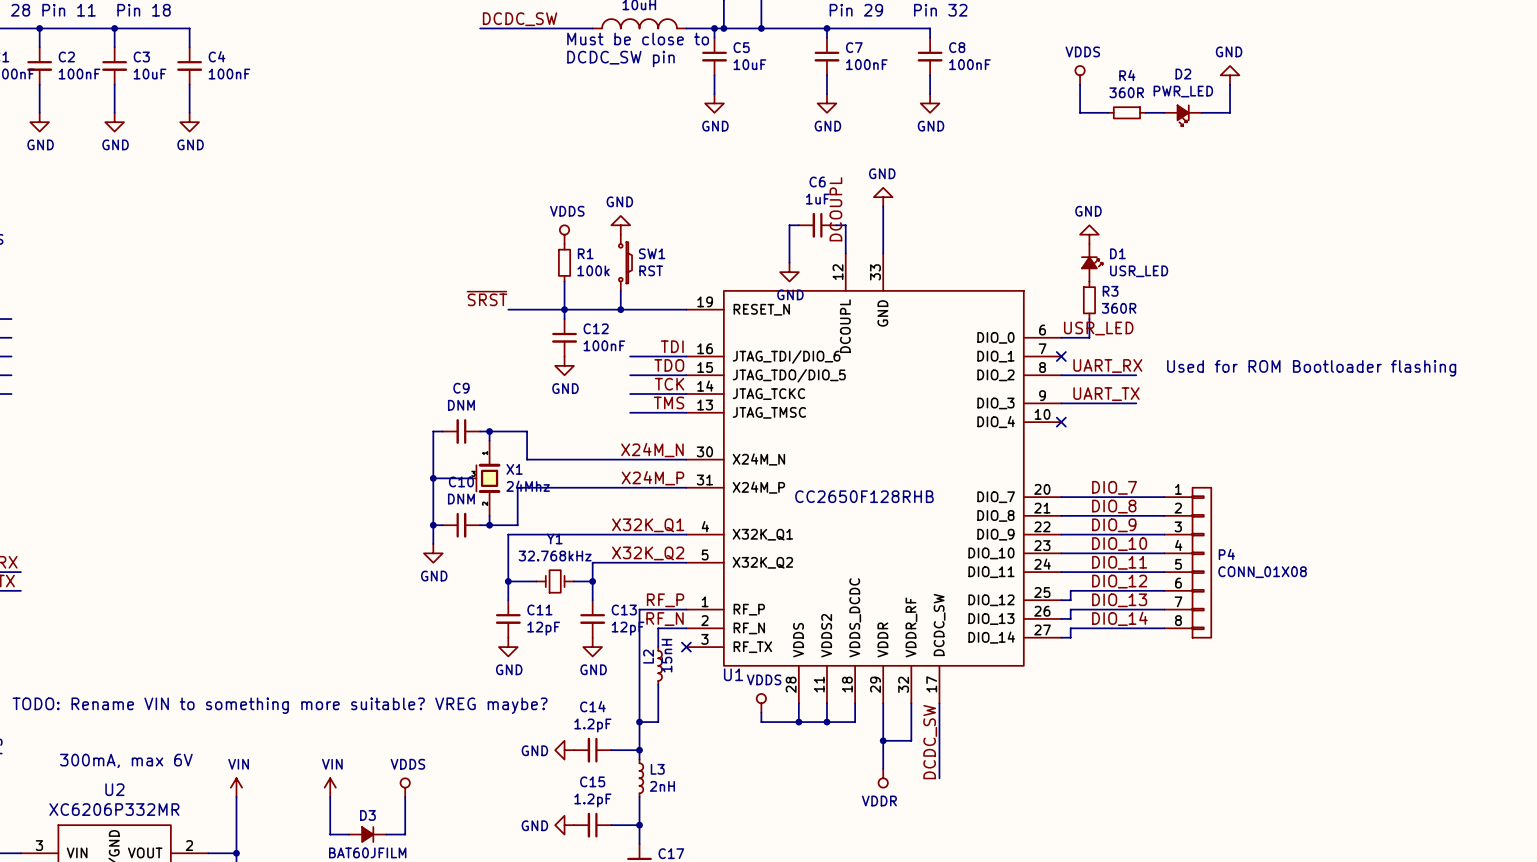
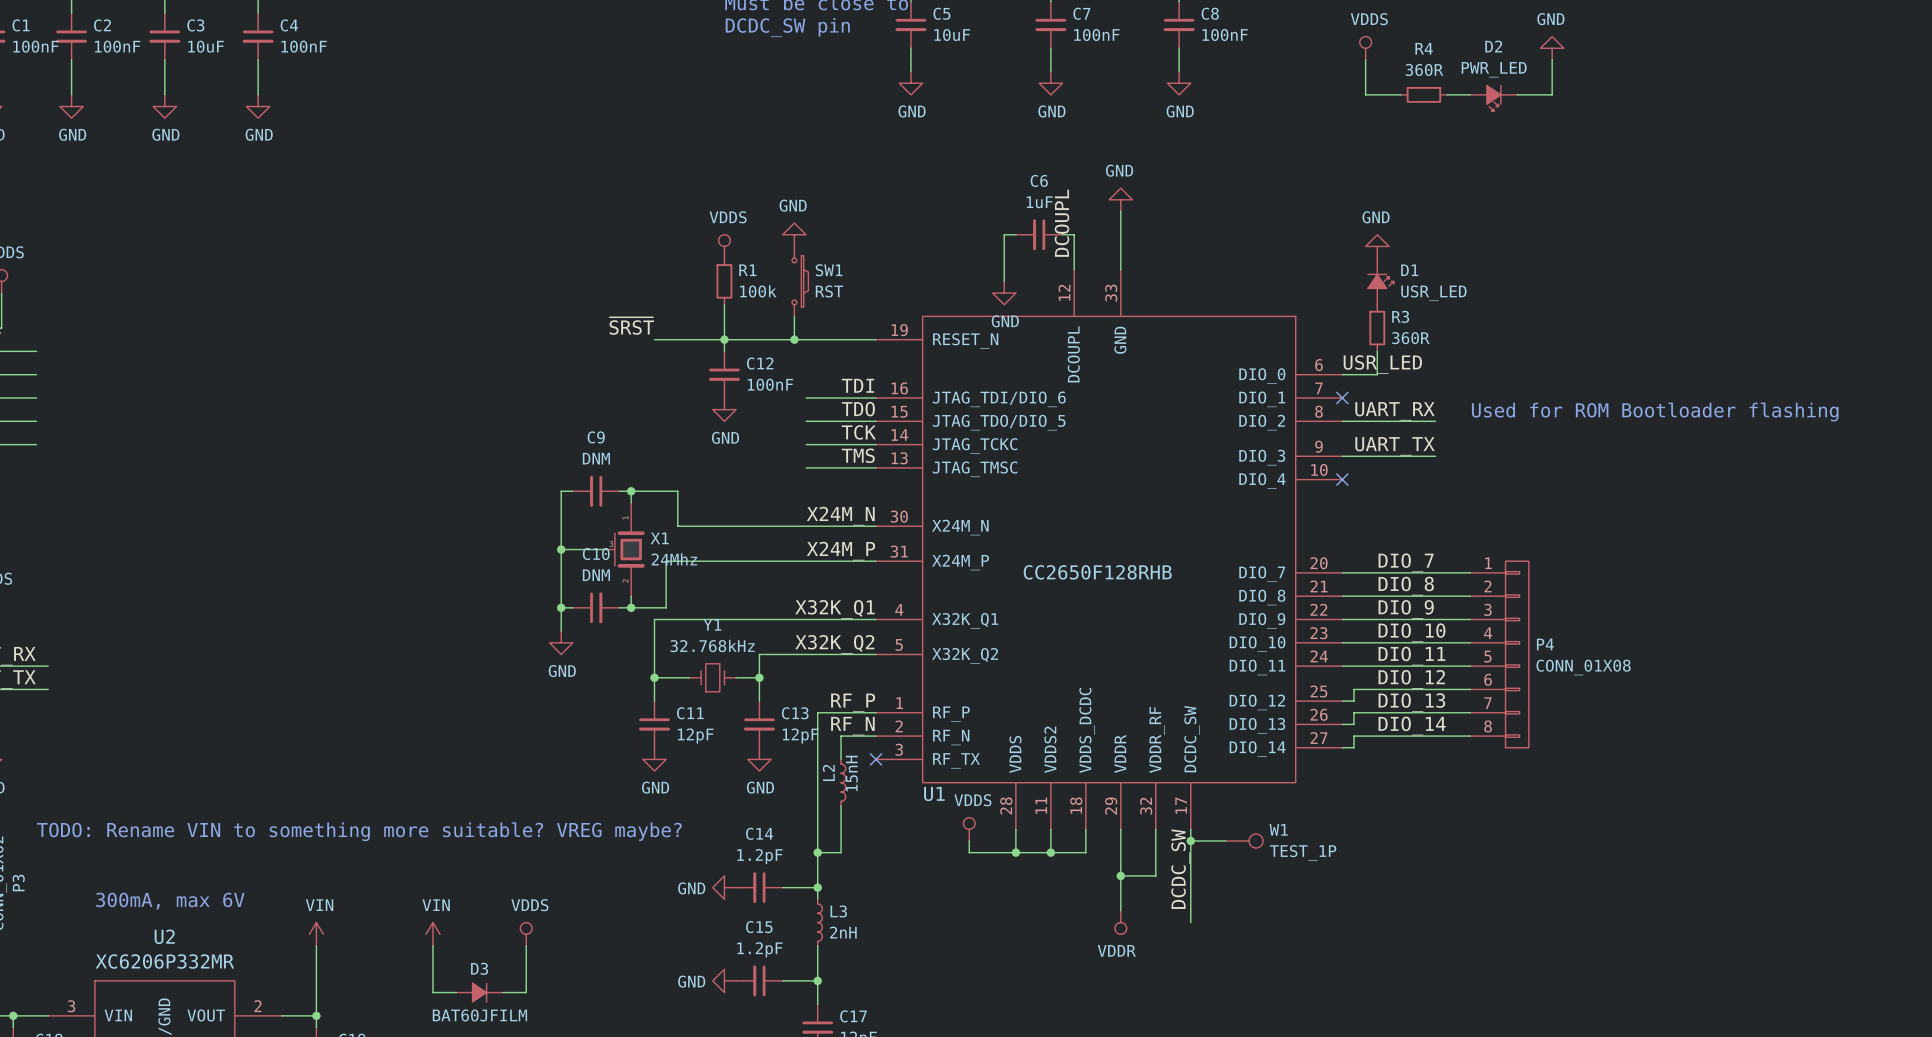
wire: none -> (1190, 841) (1225, 841)
junction: none -> (1190, 841)
W1: none -> TEST_1P (1244, 841)

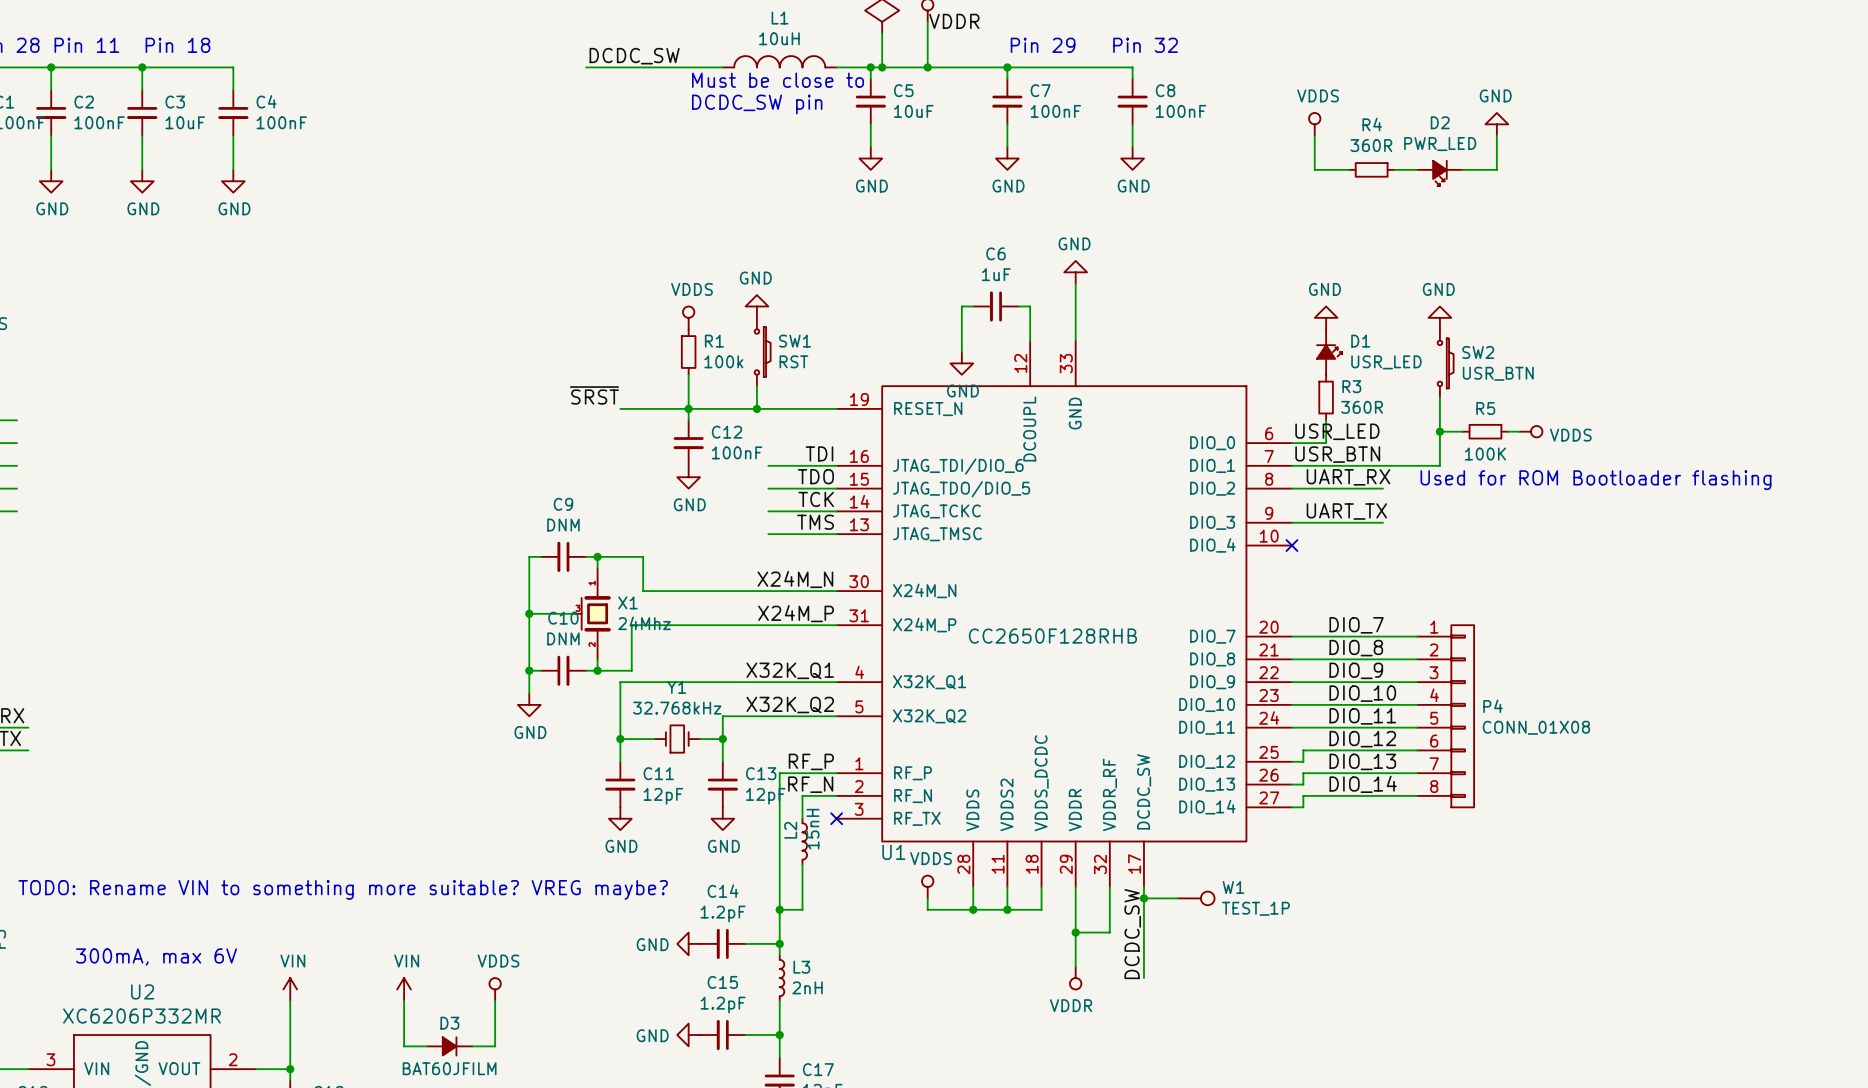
label: DCOUPL (1061, 223) -> none
power symbol: none -> GND (1439, 317)
SW2: none -> USR_BTN (1445, 363)
wire: none -> (1439, 397) (1439, 465) (1291, 465)
wire: none -> (1439, 431) (1462, 431)
junction: none -> (1439, 431)
R5: none -> 100K (1485, 431)
wire: none -> (1508, 431) (1519, 431)
power symbol: none -> VDDS (1531, 431)
label: none -> USR_BTN (1337, 454)
no-connect mark: (1342, 397) -> none

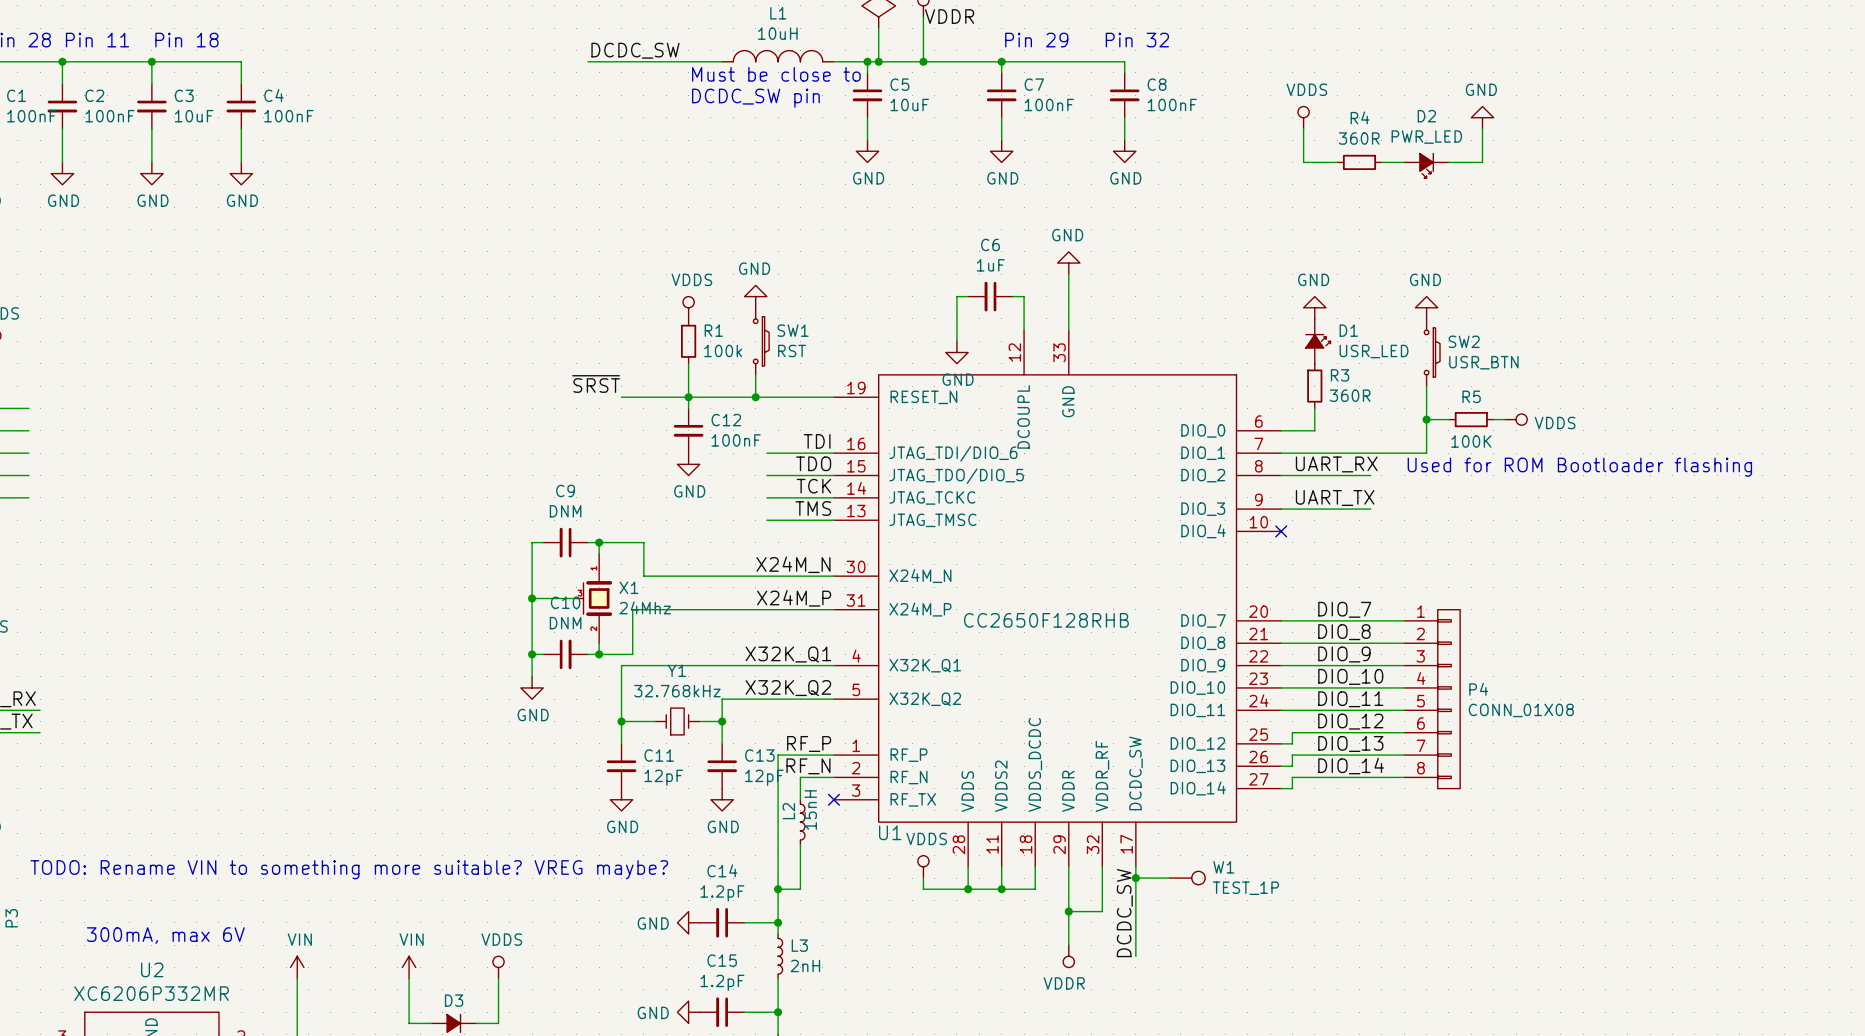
label: USR_LED (1337, 431) -> none
label: USR_BTN (1337, 454) -> none

